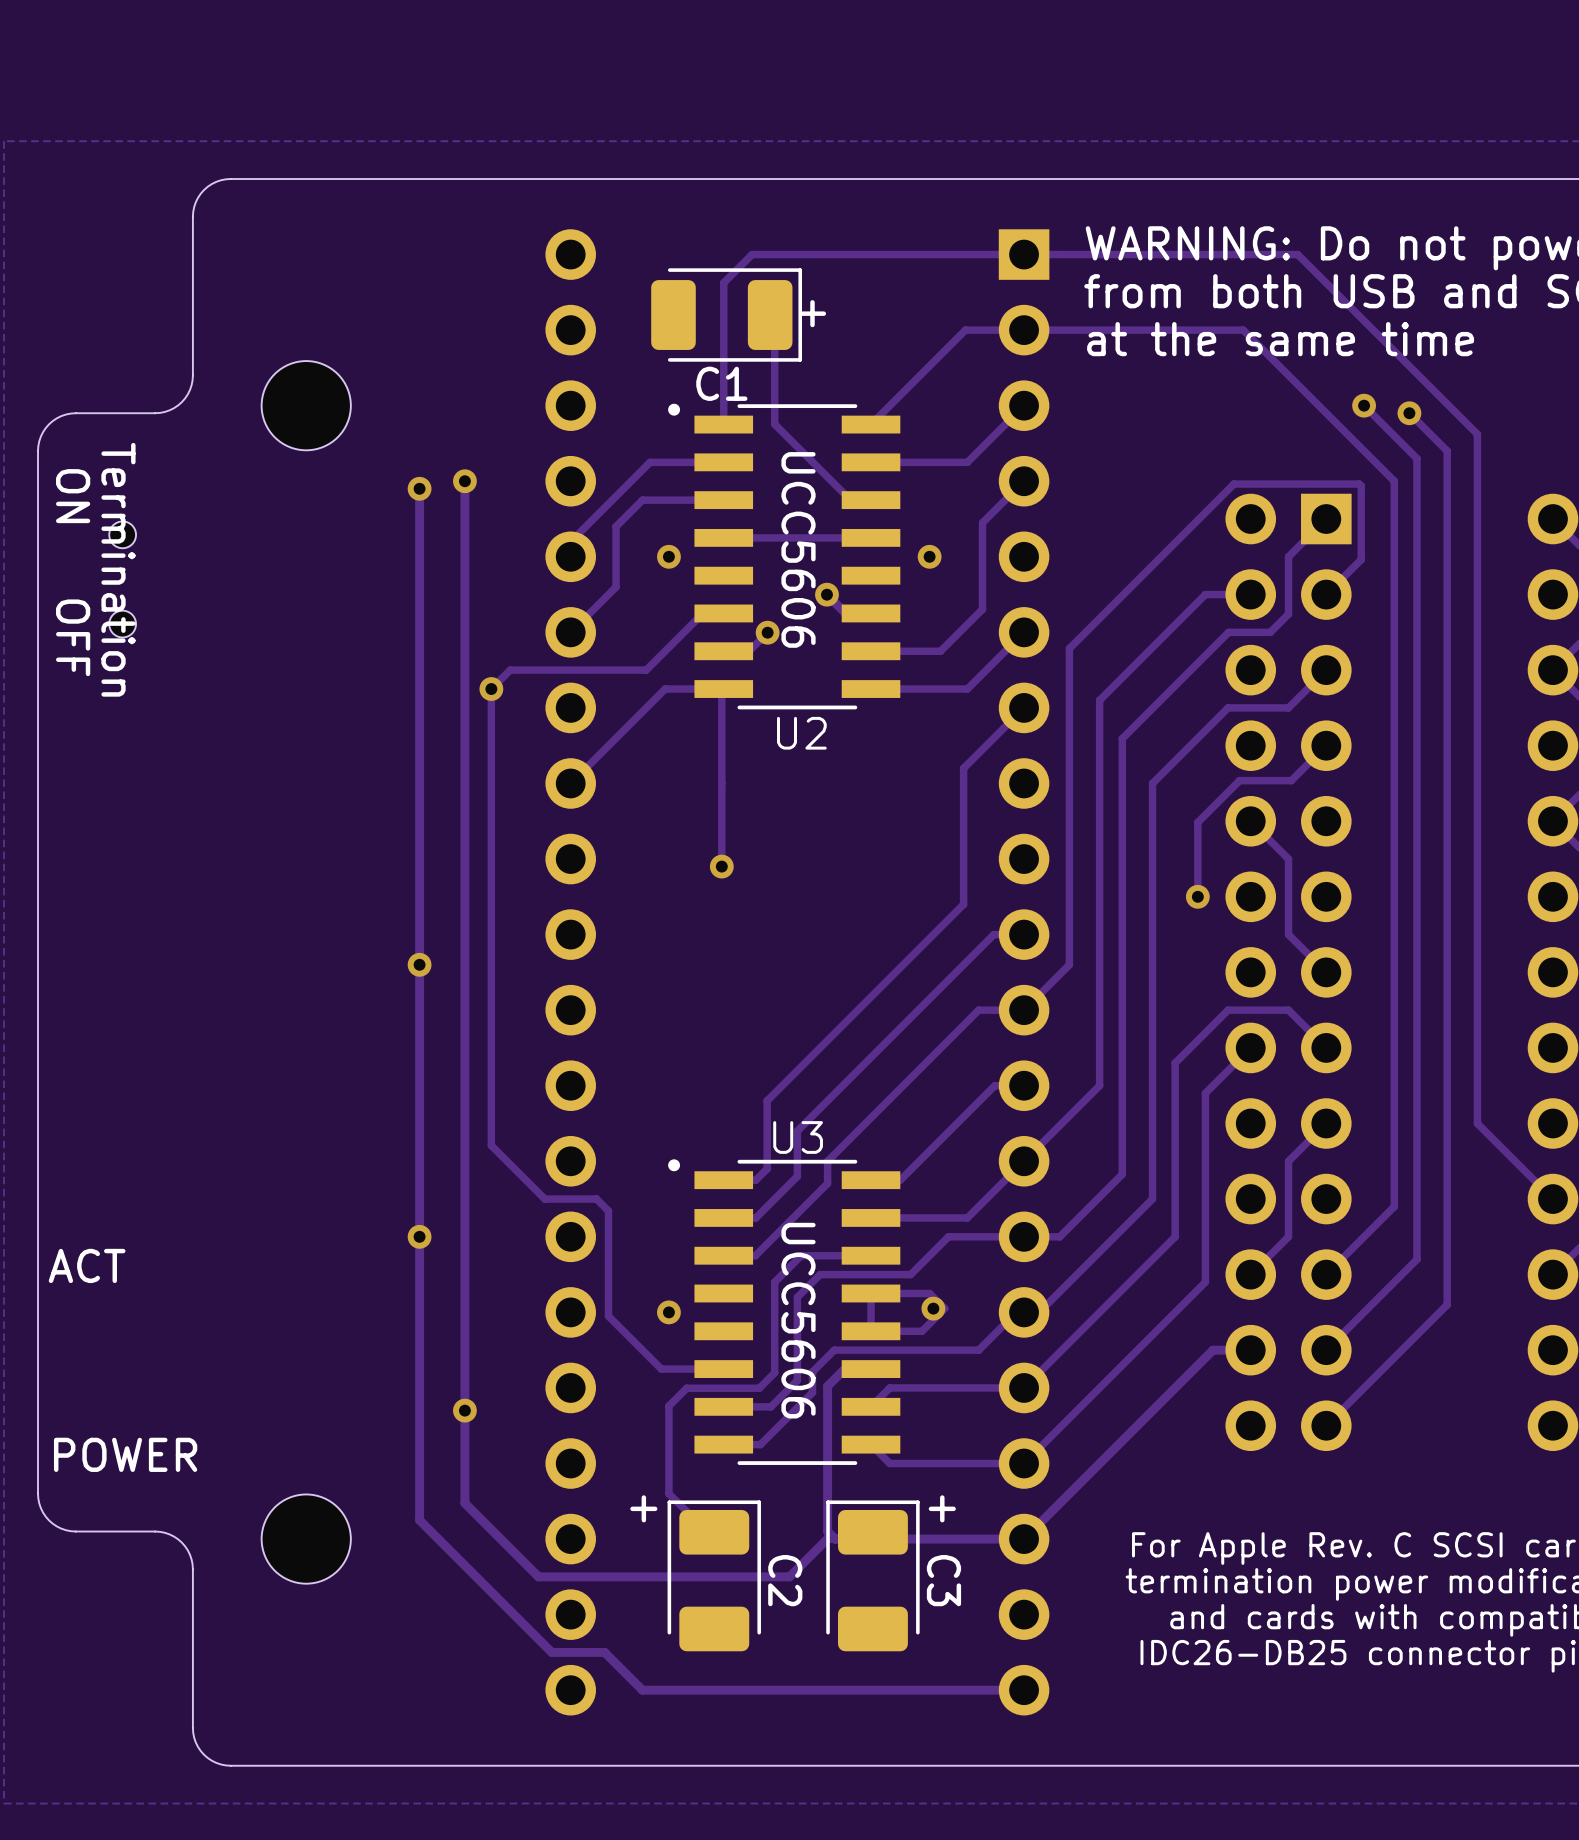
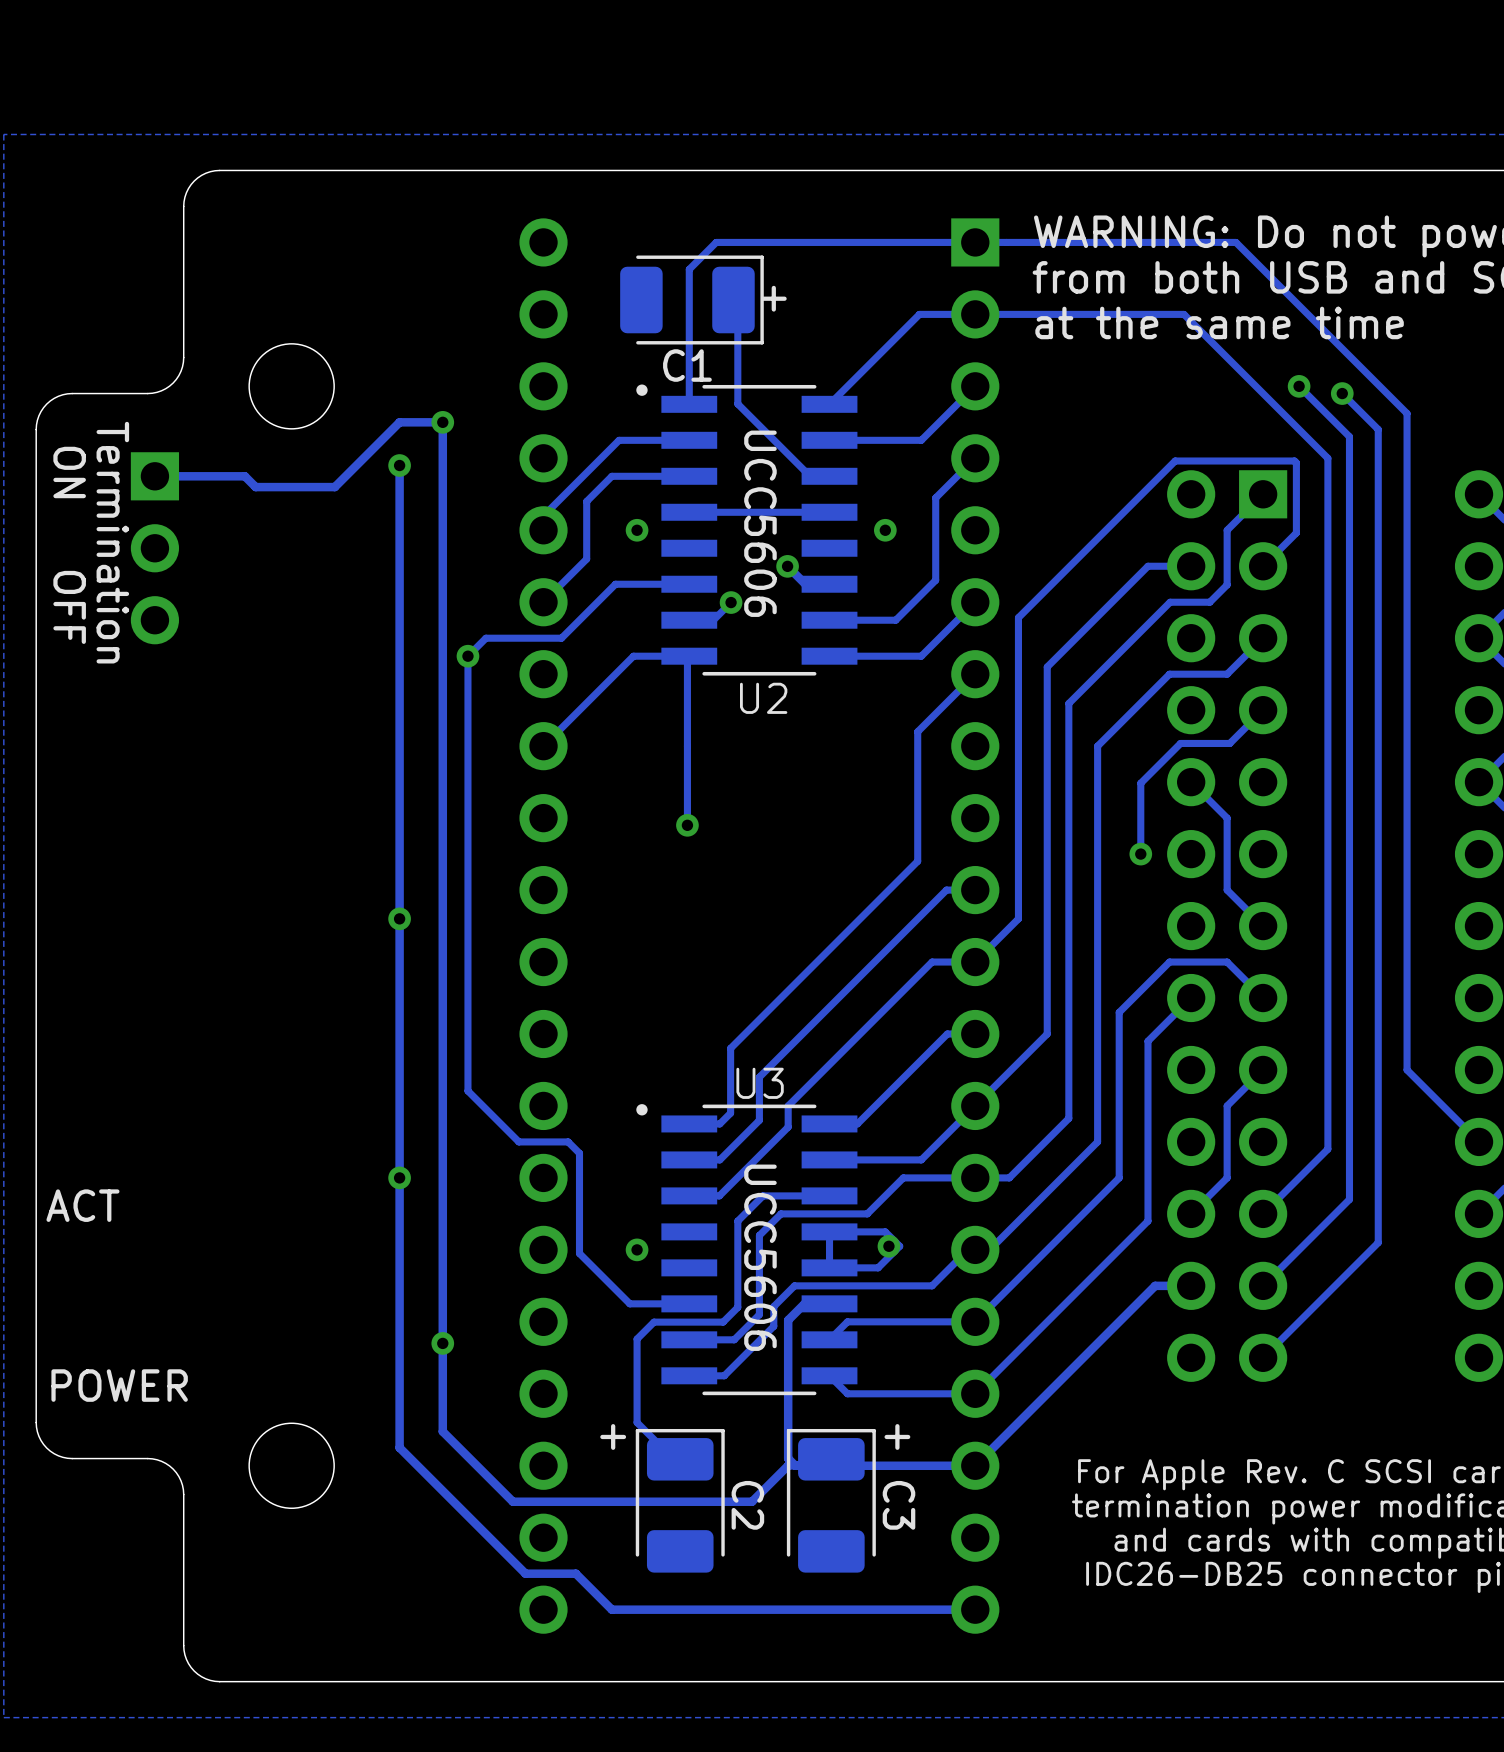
track: none -> (442, 458) (442, 422) (399, 422) (334, 487) (255, 487) (244, 476) (154, 476)
via position: (464, 481) -> (442, 422)
part: none -> (154, 548)
part: (122, 579) -> none
track: (702, 613) (646, 670) (589, 670) -> (669, 584) (615, 584) (561, 638)

